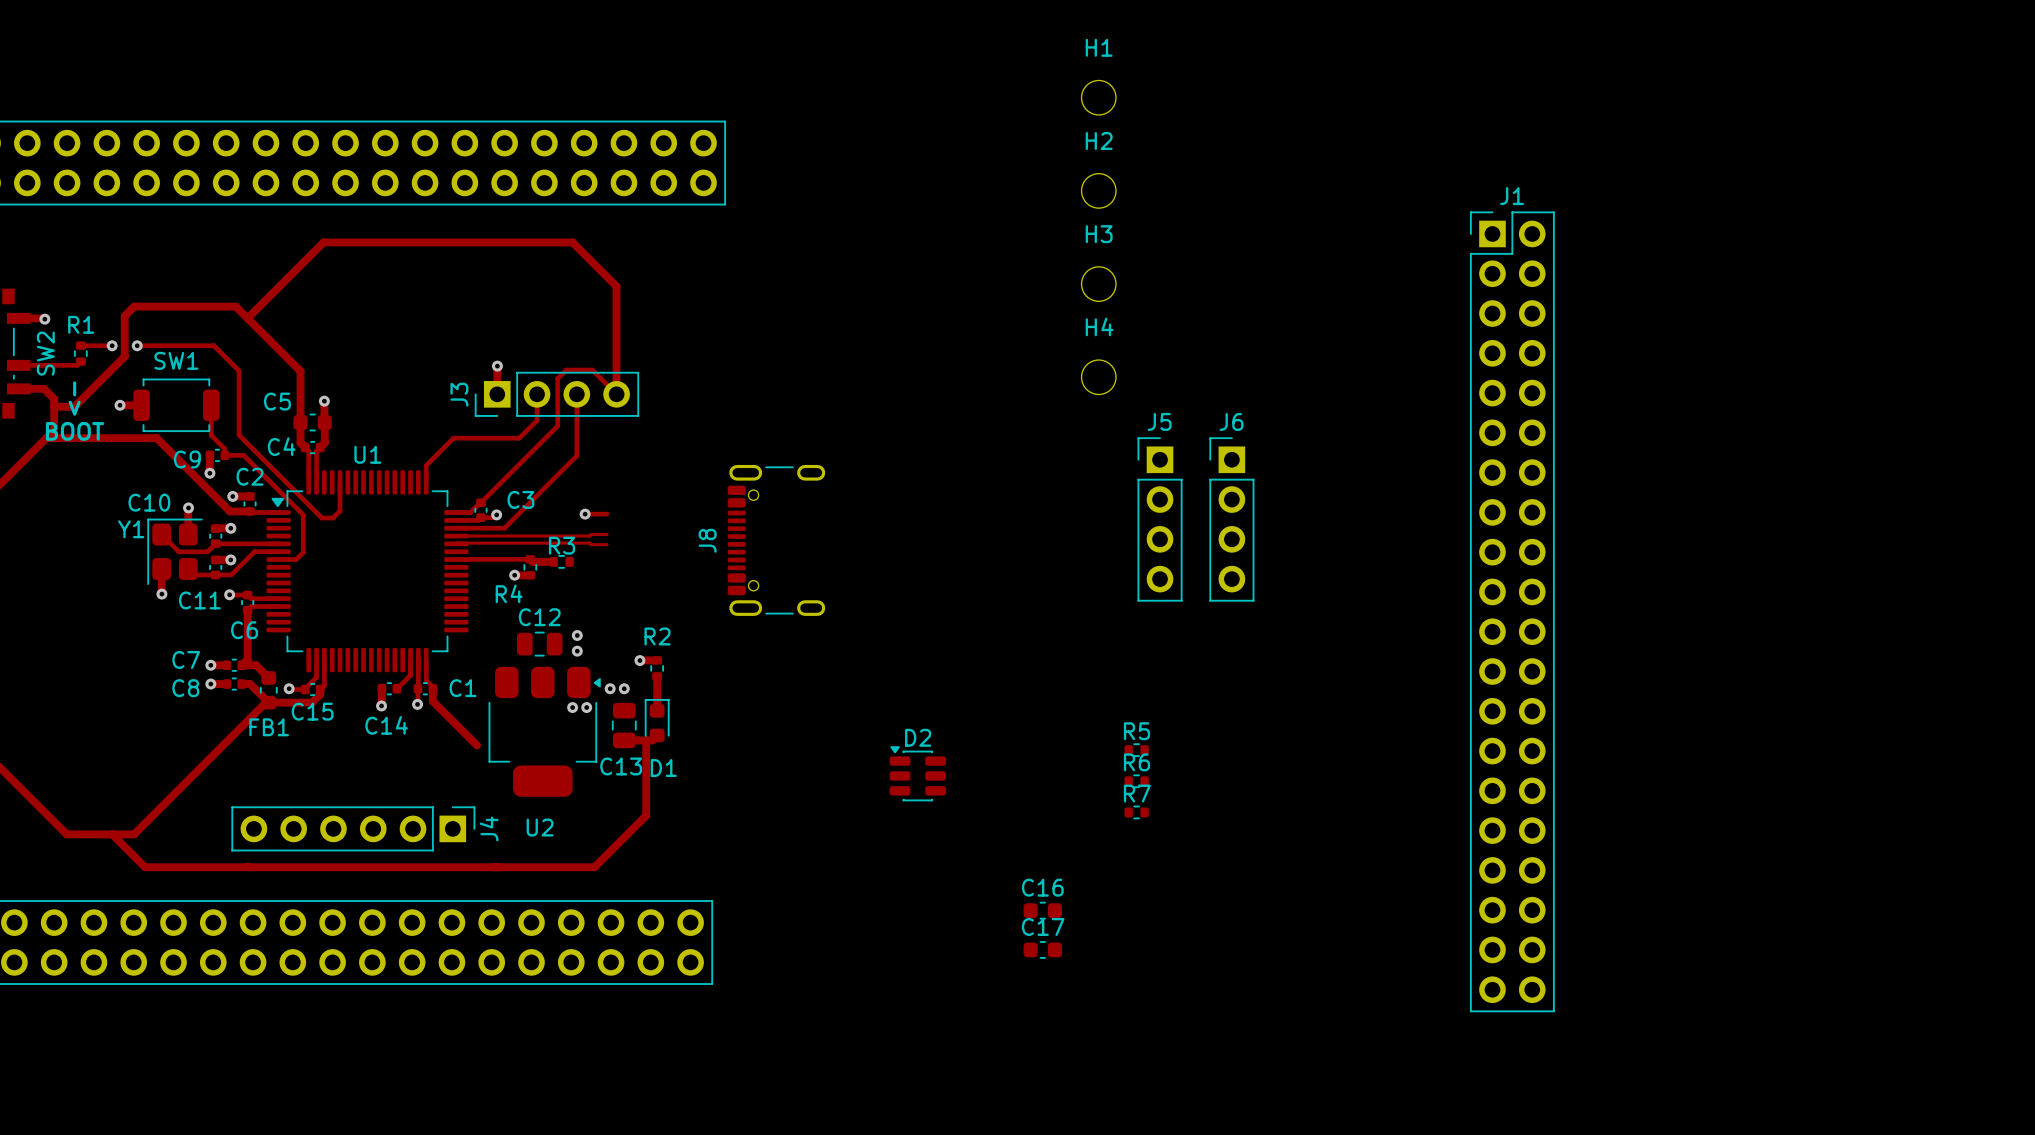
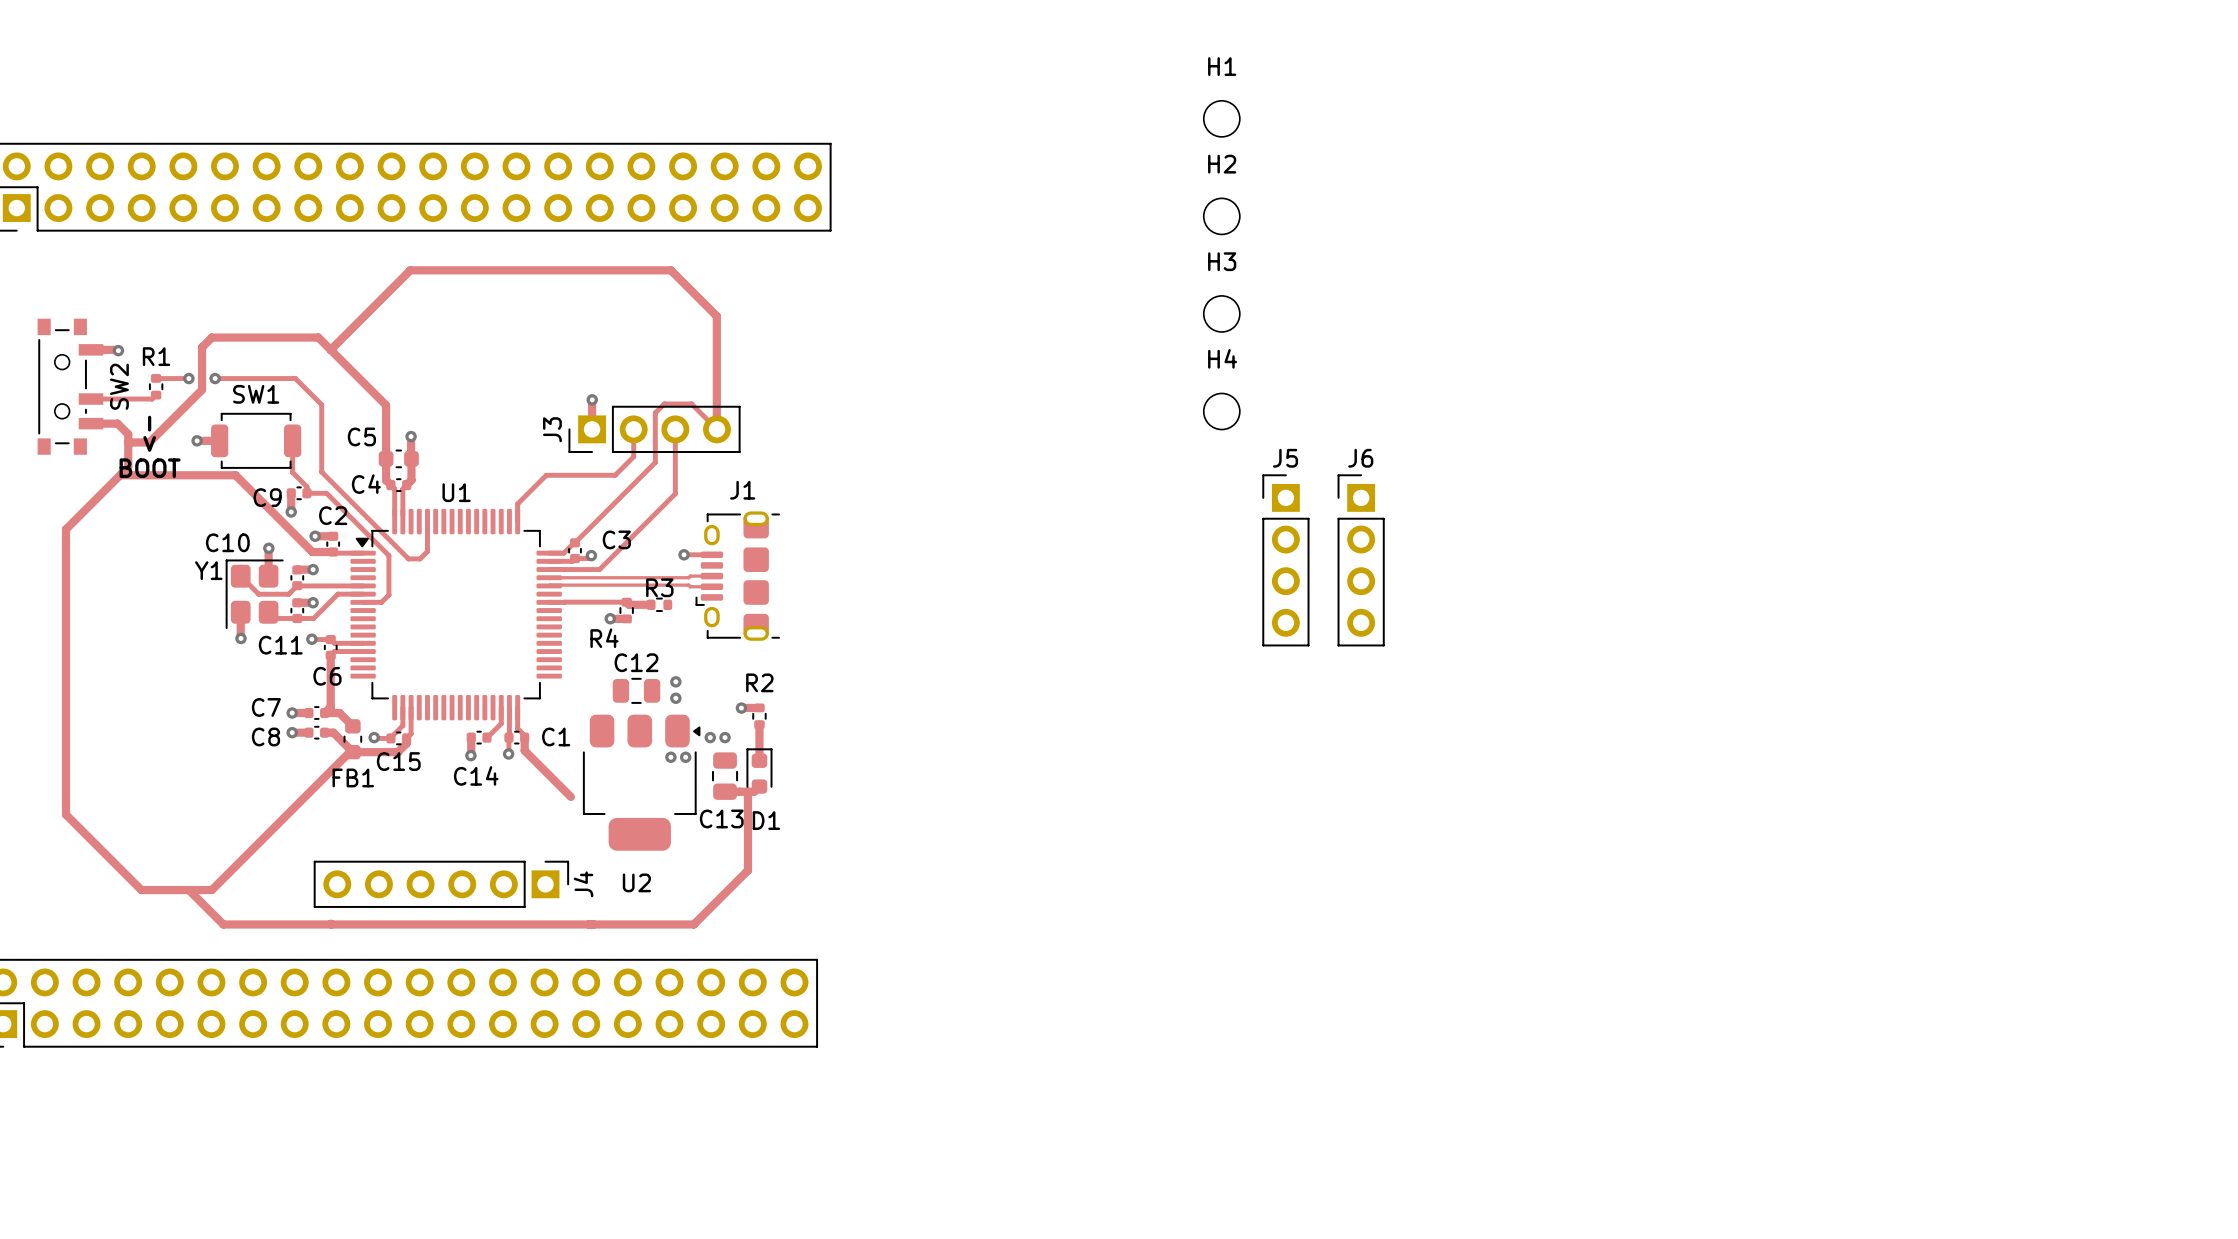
J1 name position: J1 (1512, 196) -> J1 (742, 490)
J1 footprint: [1469, 211, 1555, 1013] -> [695, 511, 780, 641]
J8: (776, 540) -> none
R5: (1136, 750) -> none
D2: (917, 773) -> none
R6: (1136, 781) -> none
R7: (1136, 812) -> none
C16: (1042, 910) -> none
C17: (1042, 949) -> none

